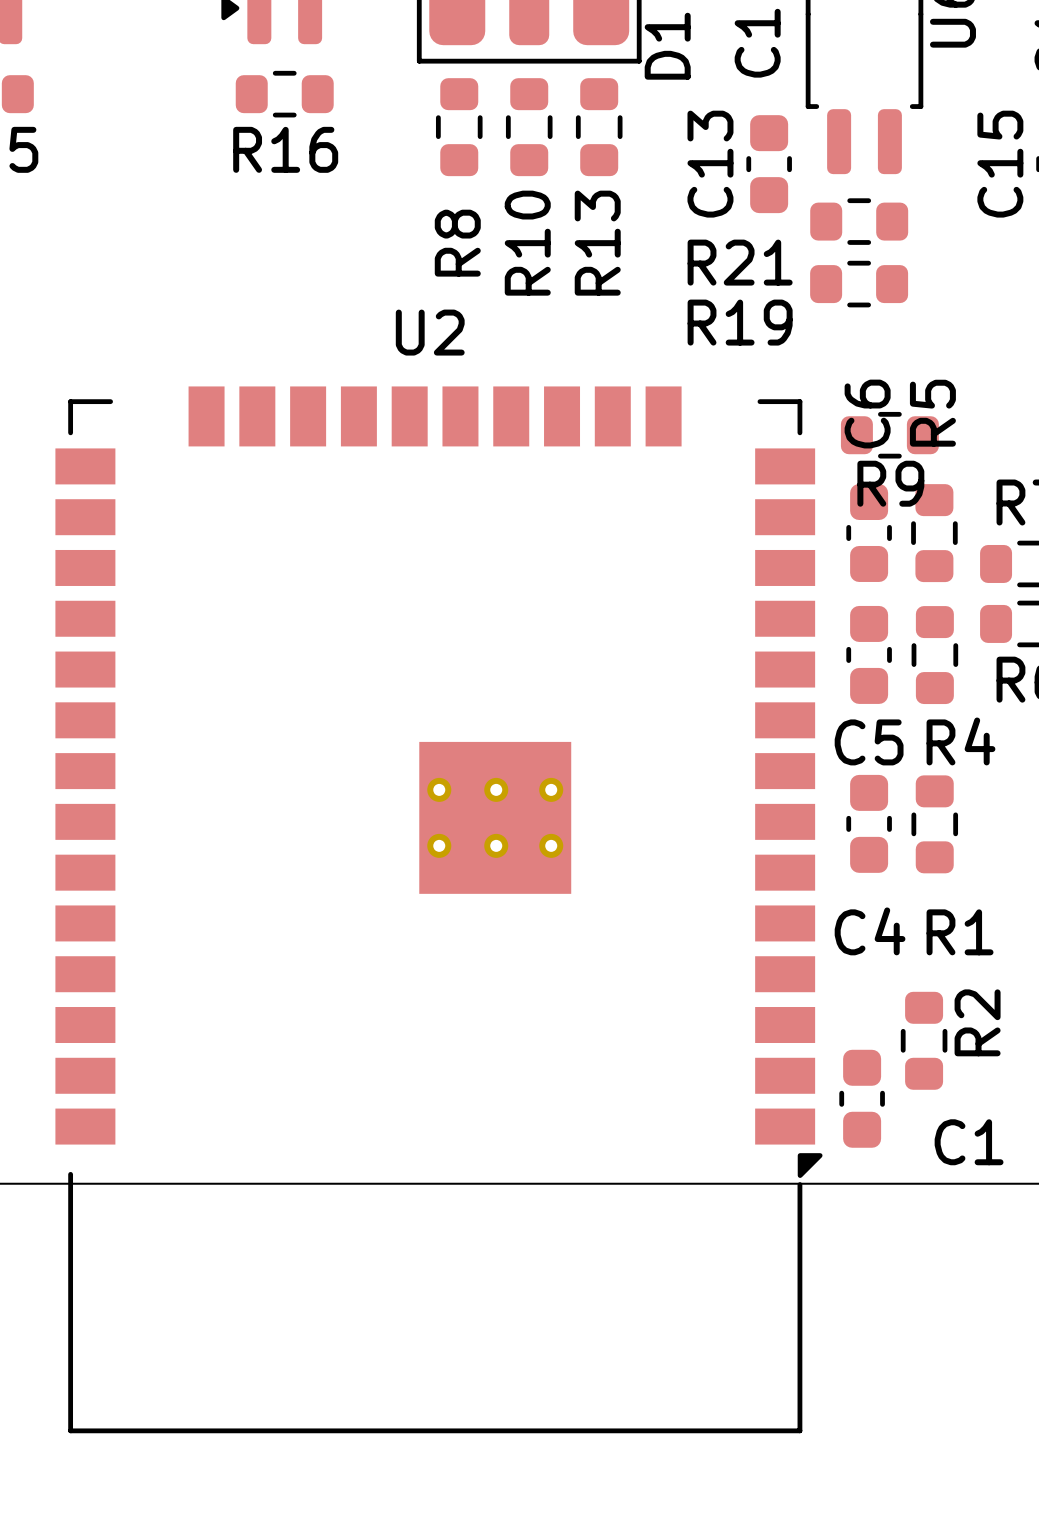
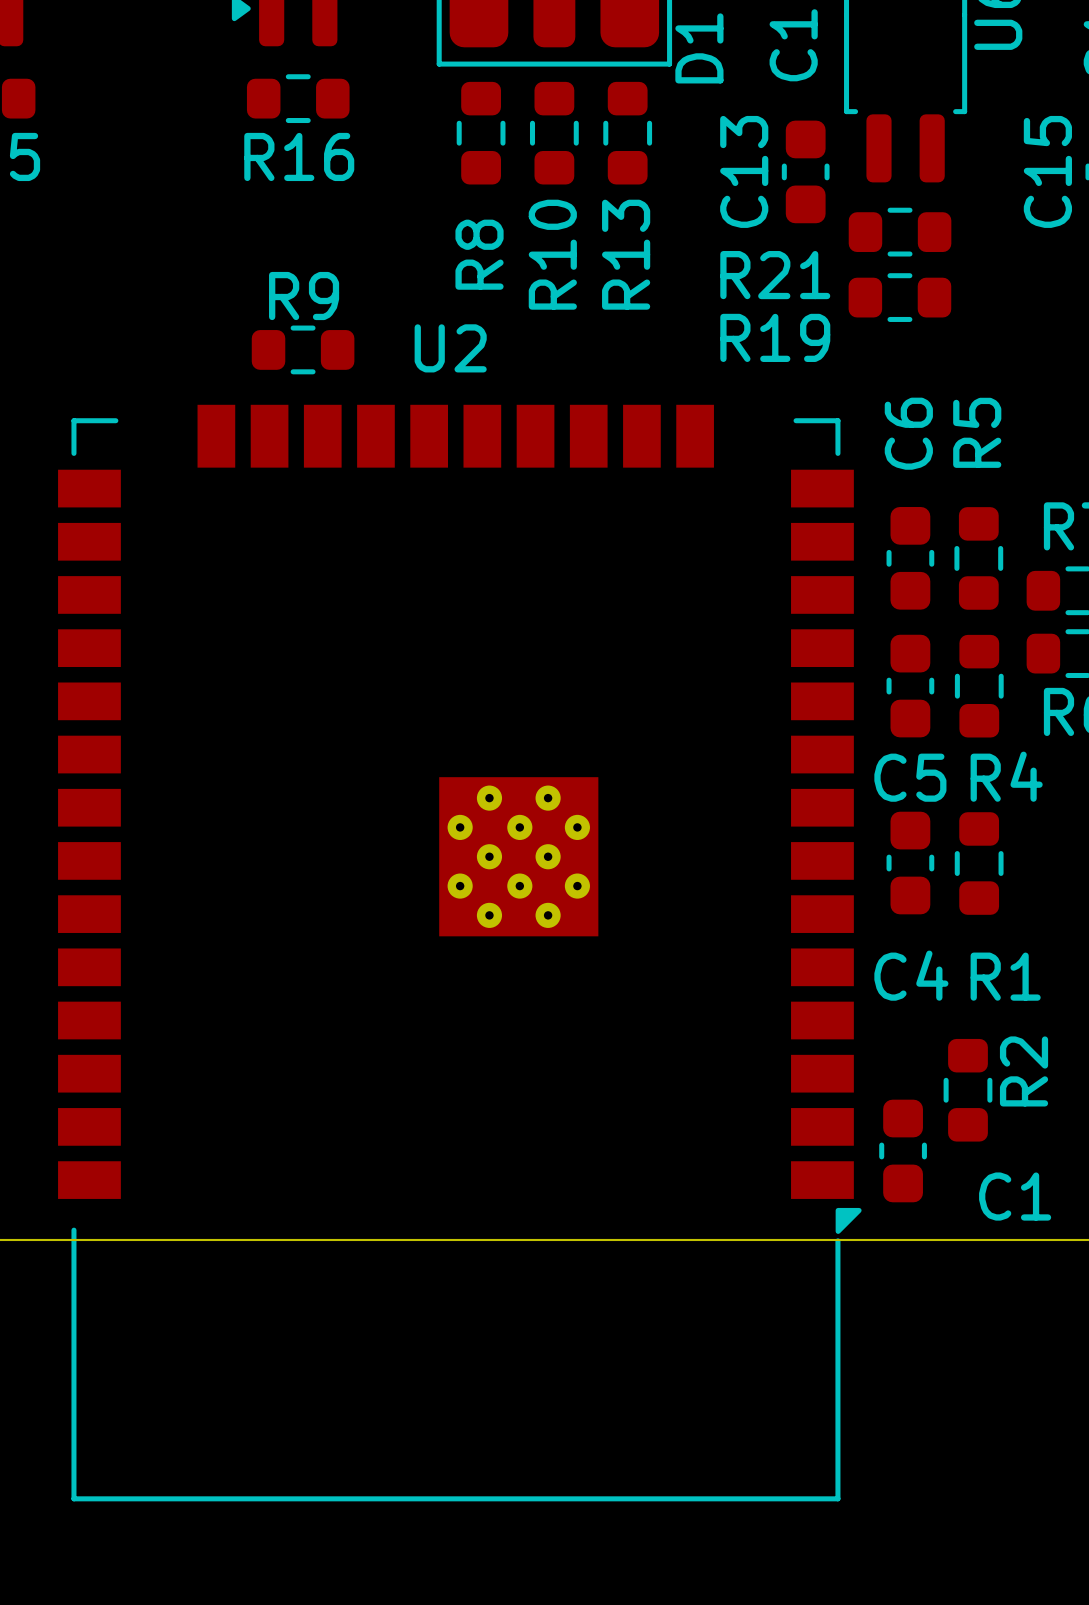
U2 footprint: [55, 386, 823, 1434] -> [58, 404, 862, 1502]
R9 position: (889, 435) -> (303, 349)
R9 name position: R9 (890, 483) -> R9 (304, 296)

